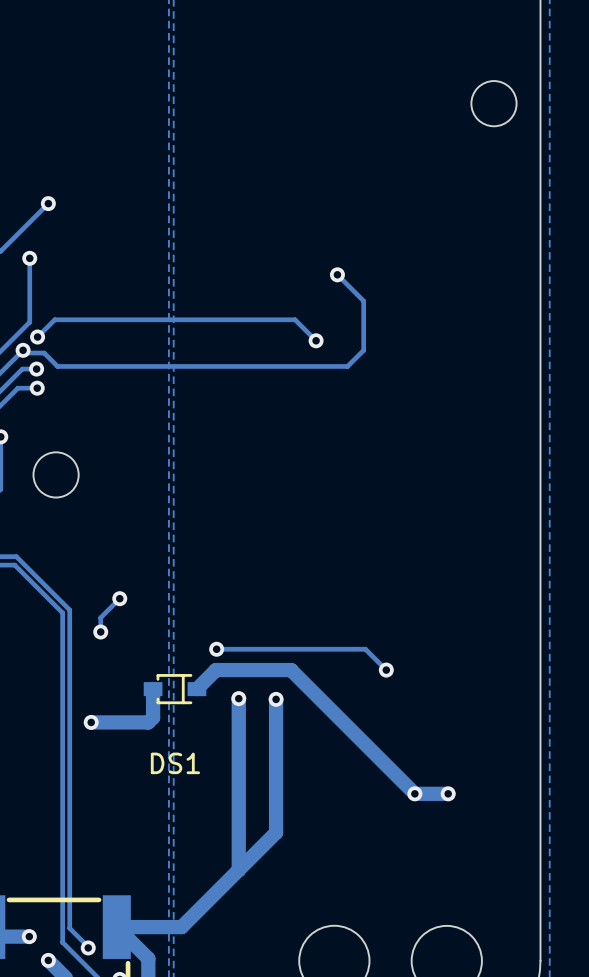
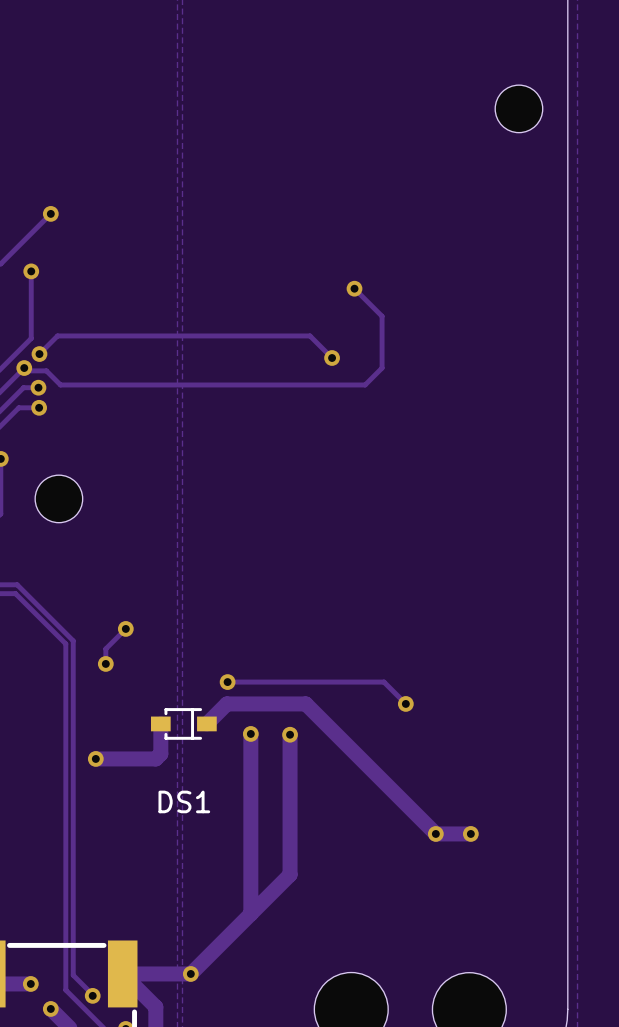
via: none -> (190, 973)

